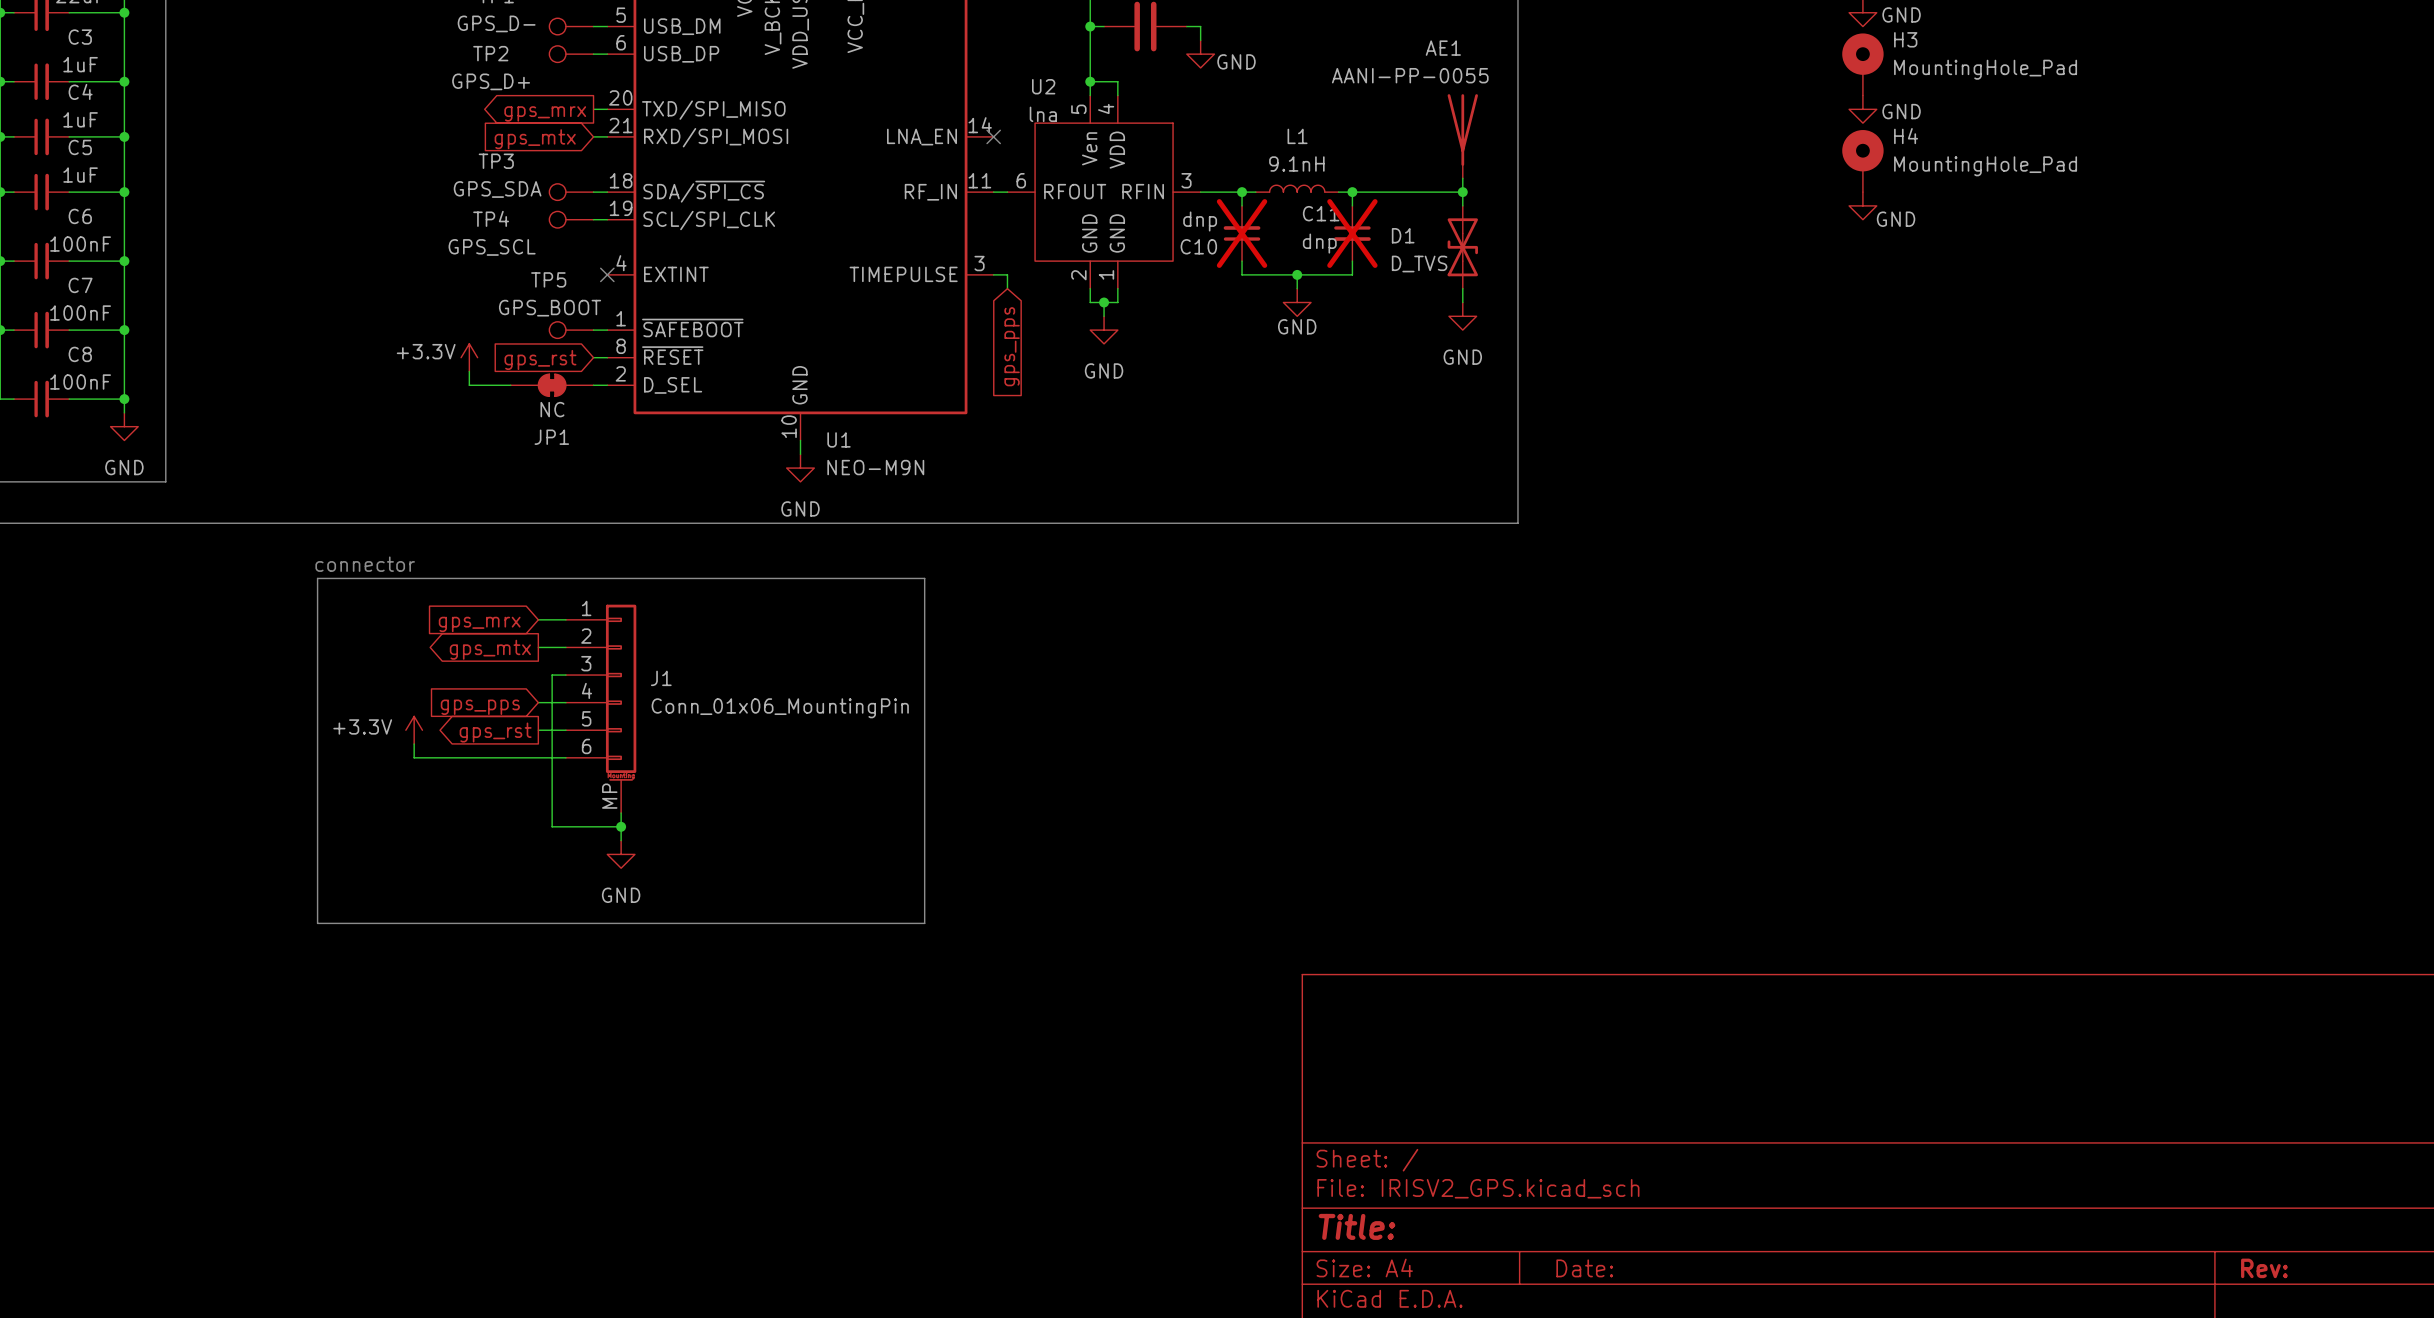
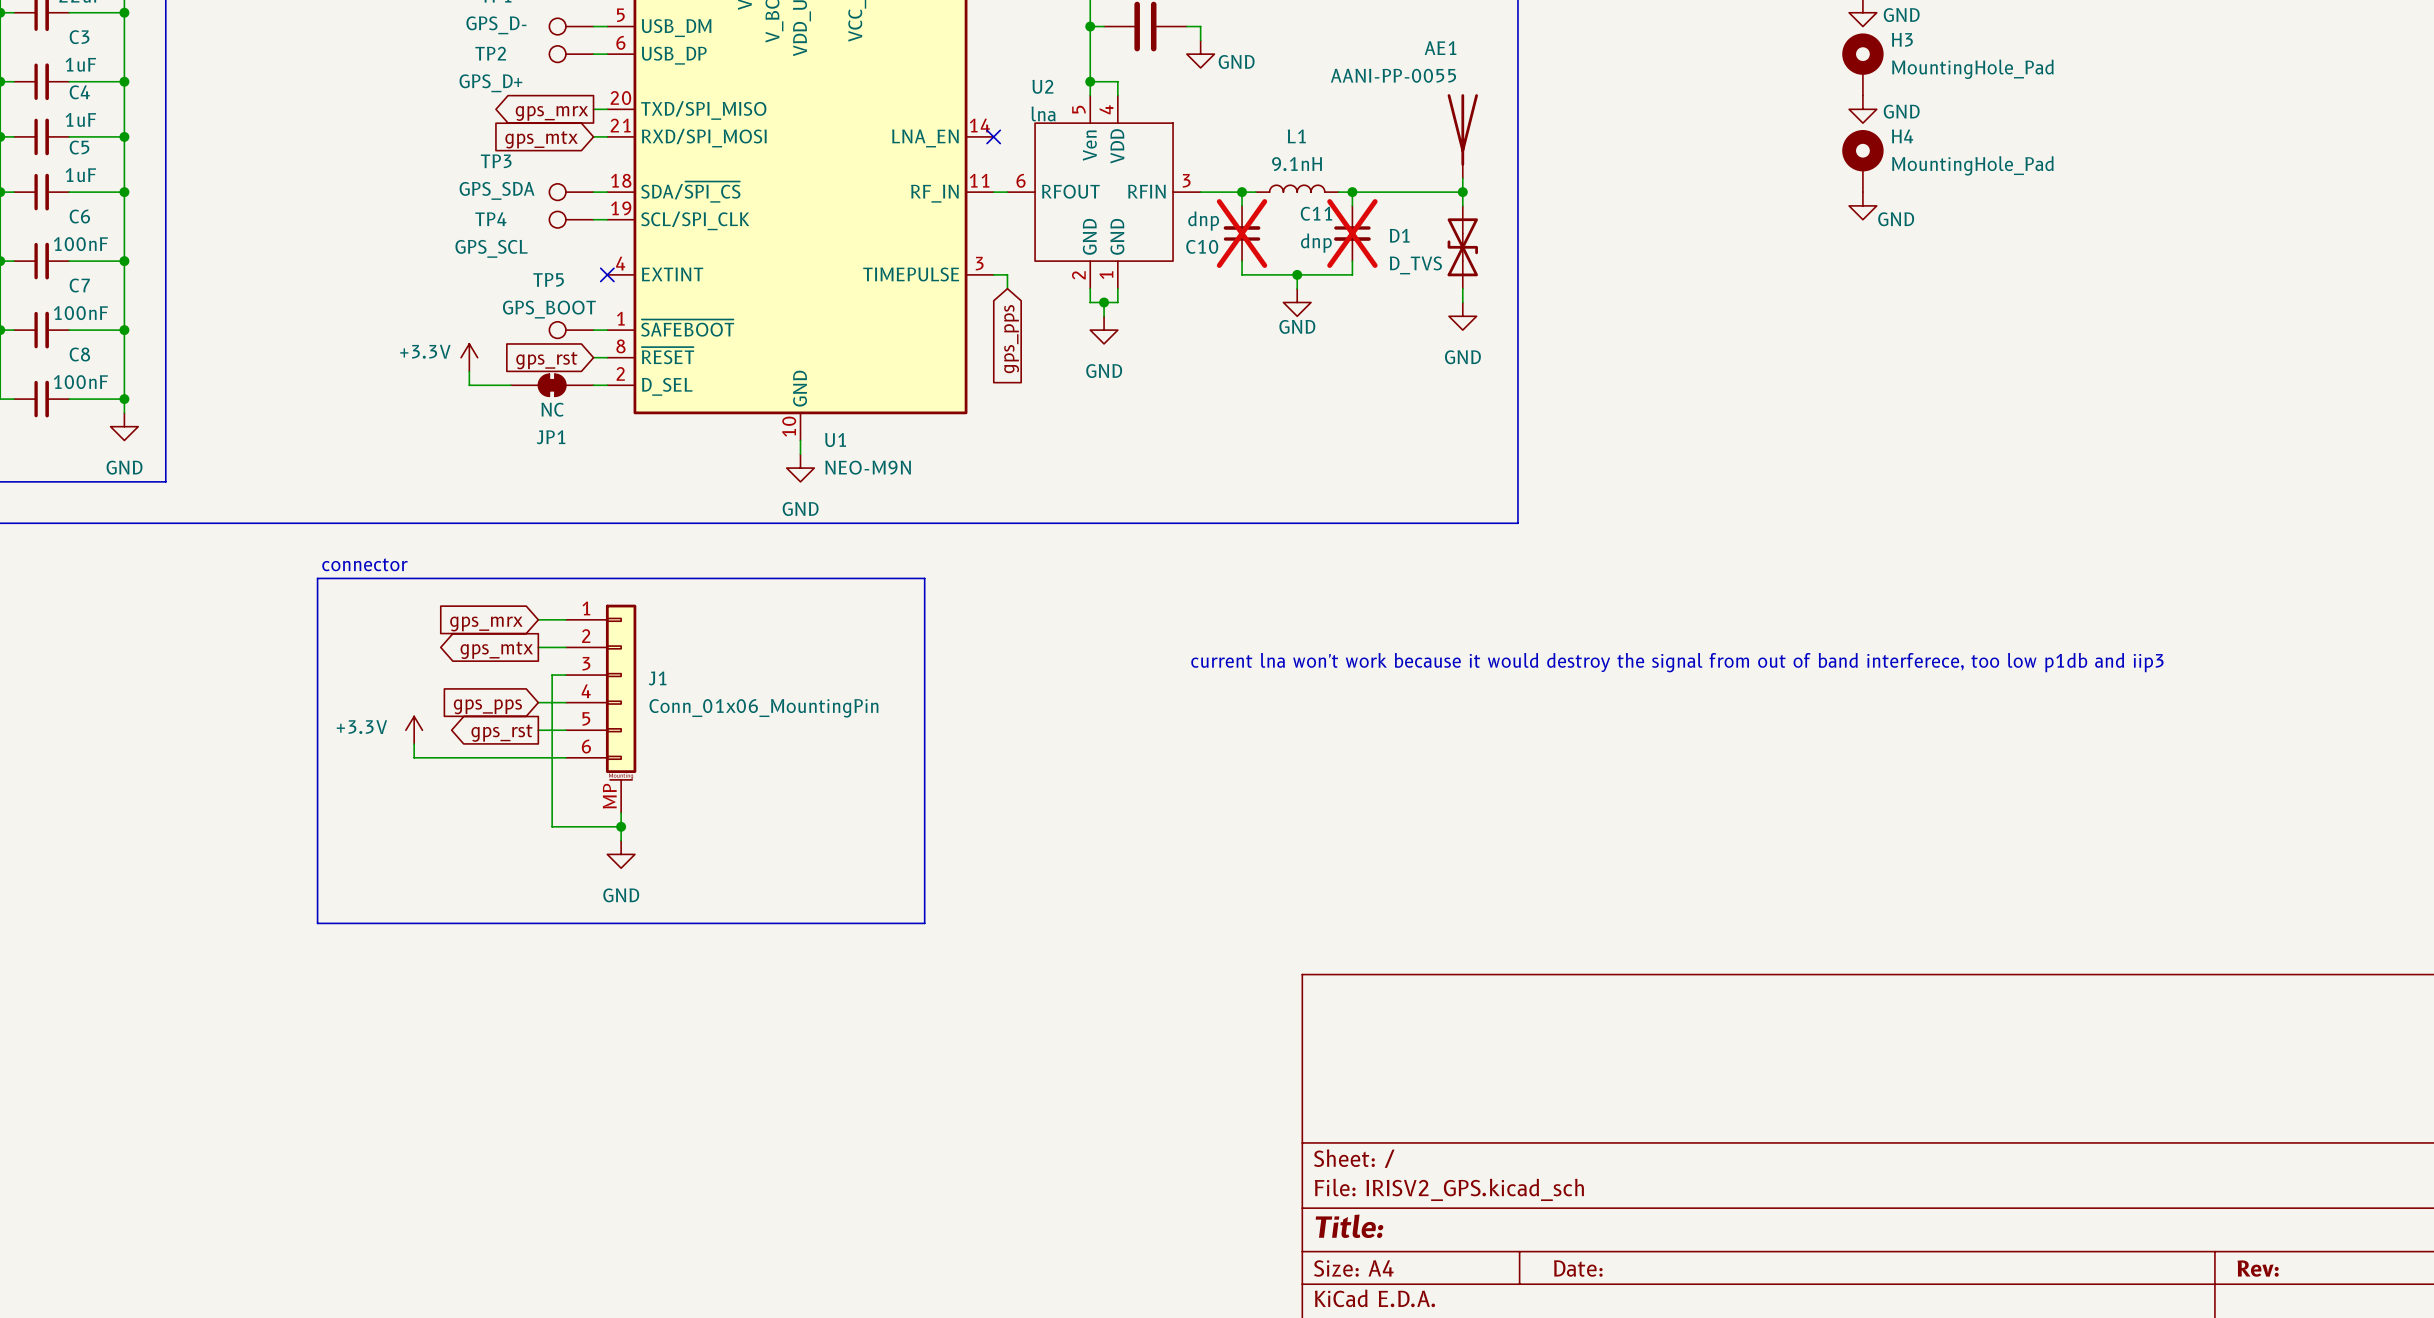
text: none -> current lna won't work because it would destroy the signal from out of band interferece, too low p1db and iip3 (1677, 662)

